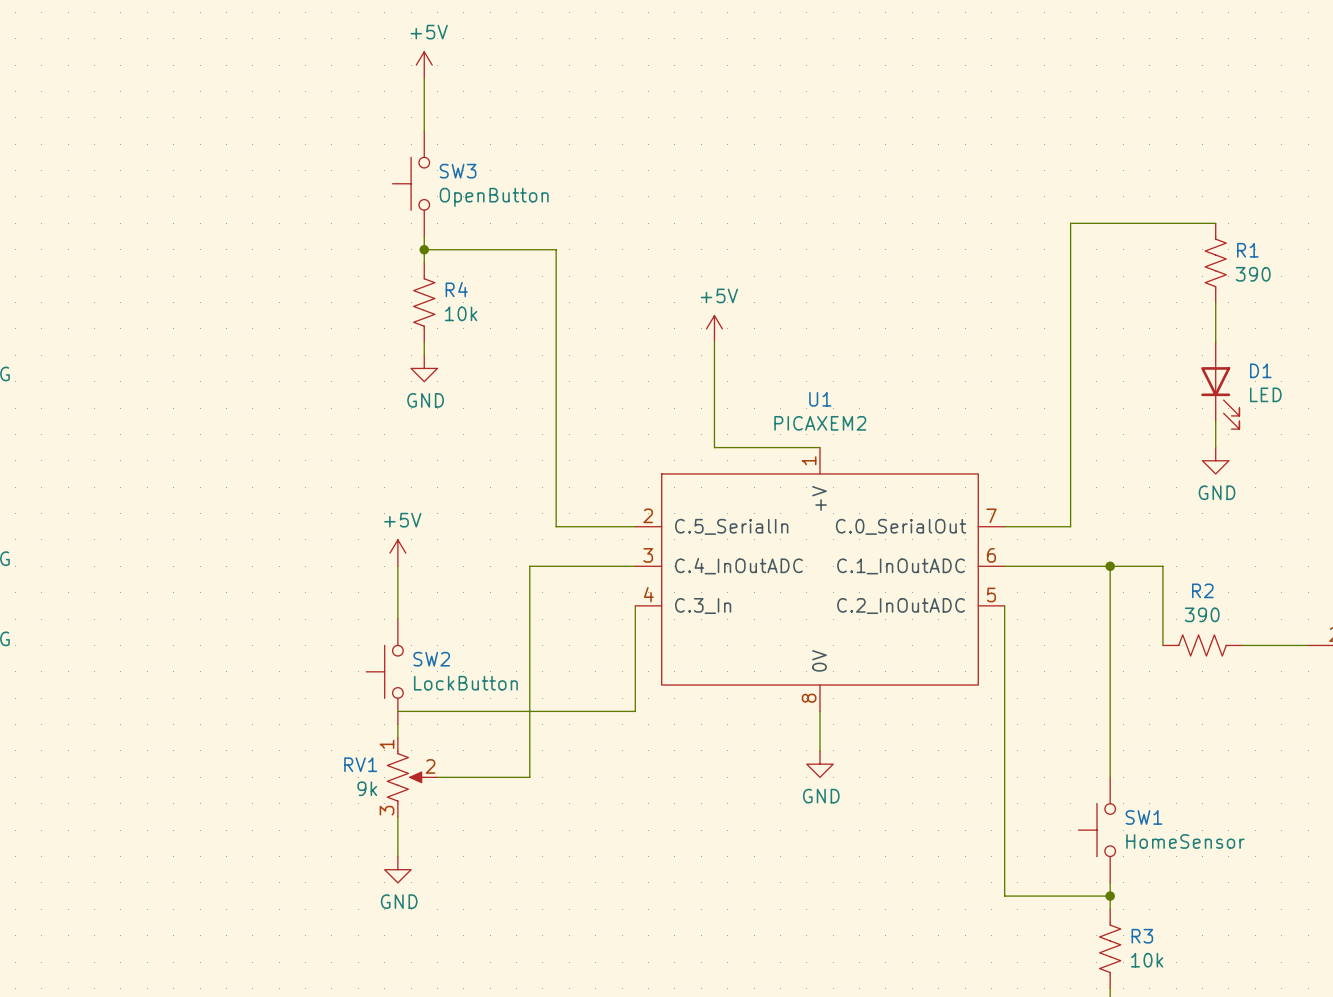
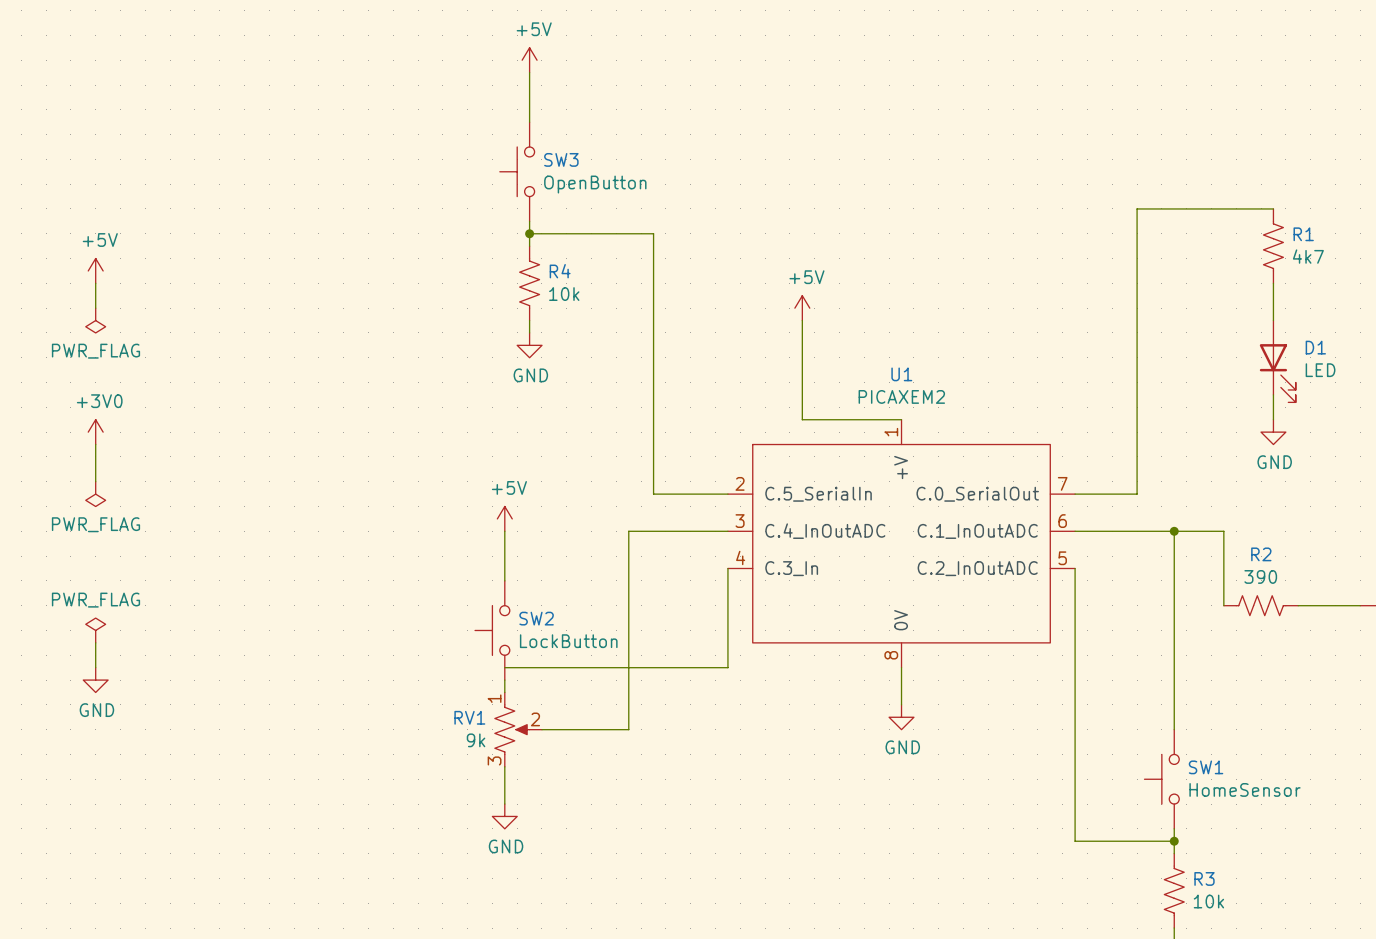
R1 value: 390 (1253, 274) -> 4k7 (1308, 256)

